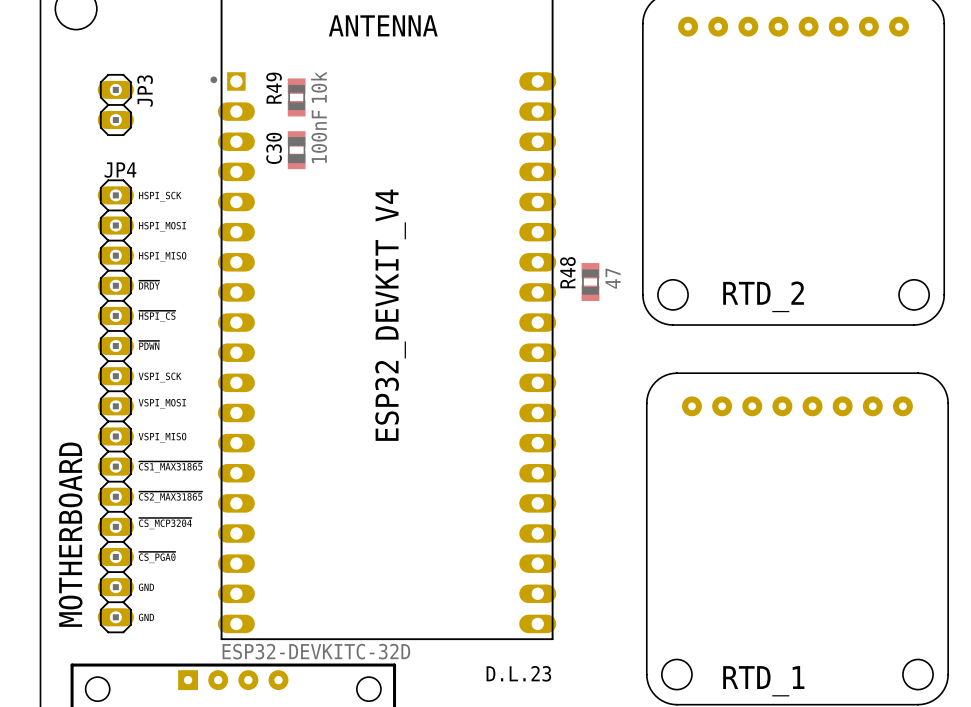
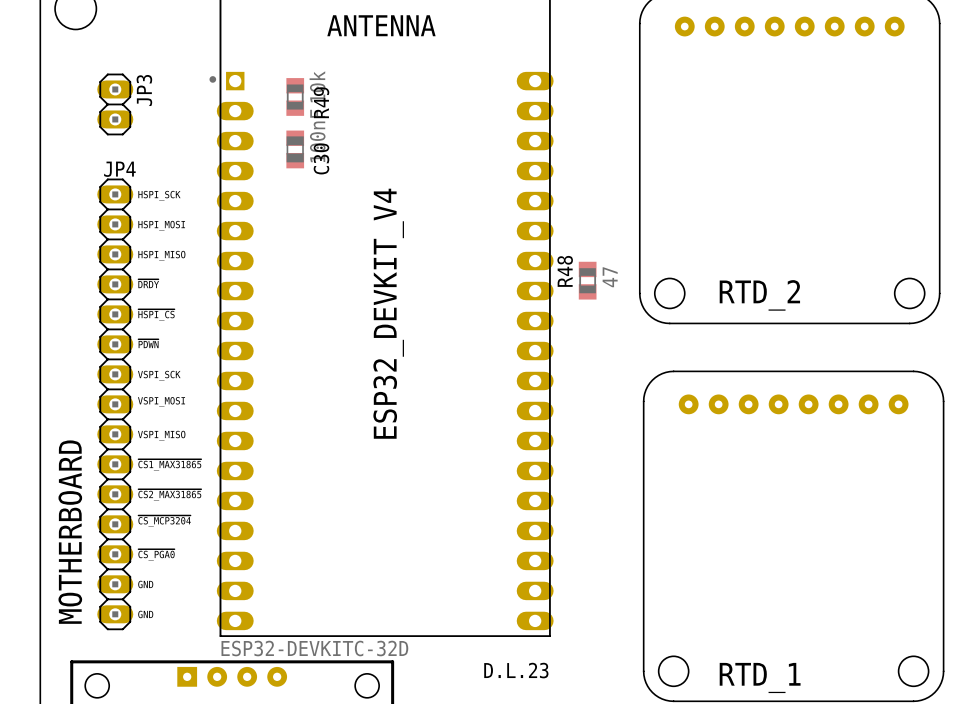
R49 name position: R49 (274, 88) -> R49 (321, 102)
C30 name position: C30 (274, 148) -> C30 (321, 158)

